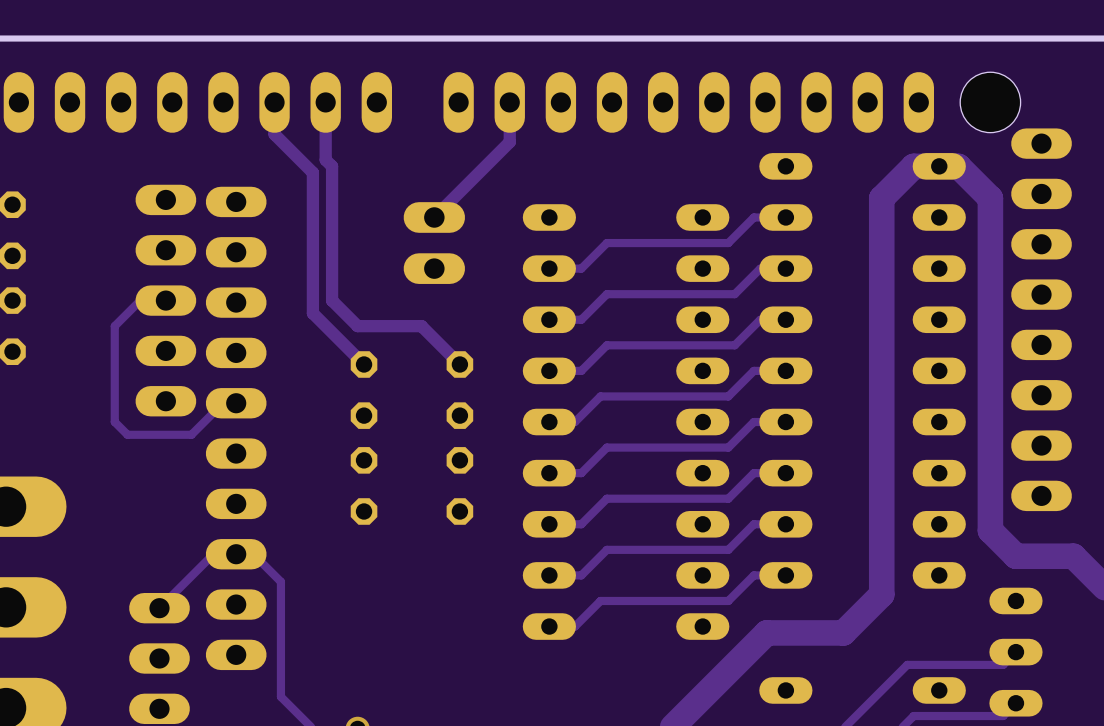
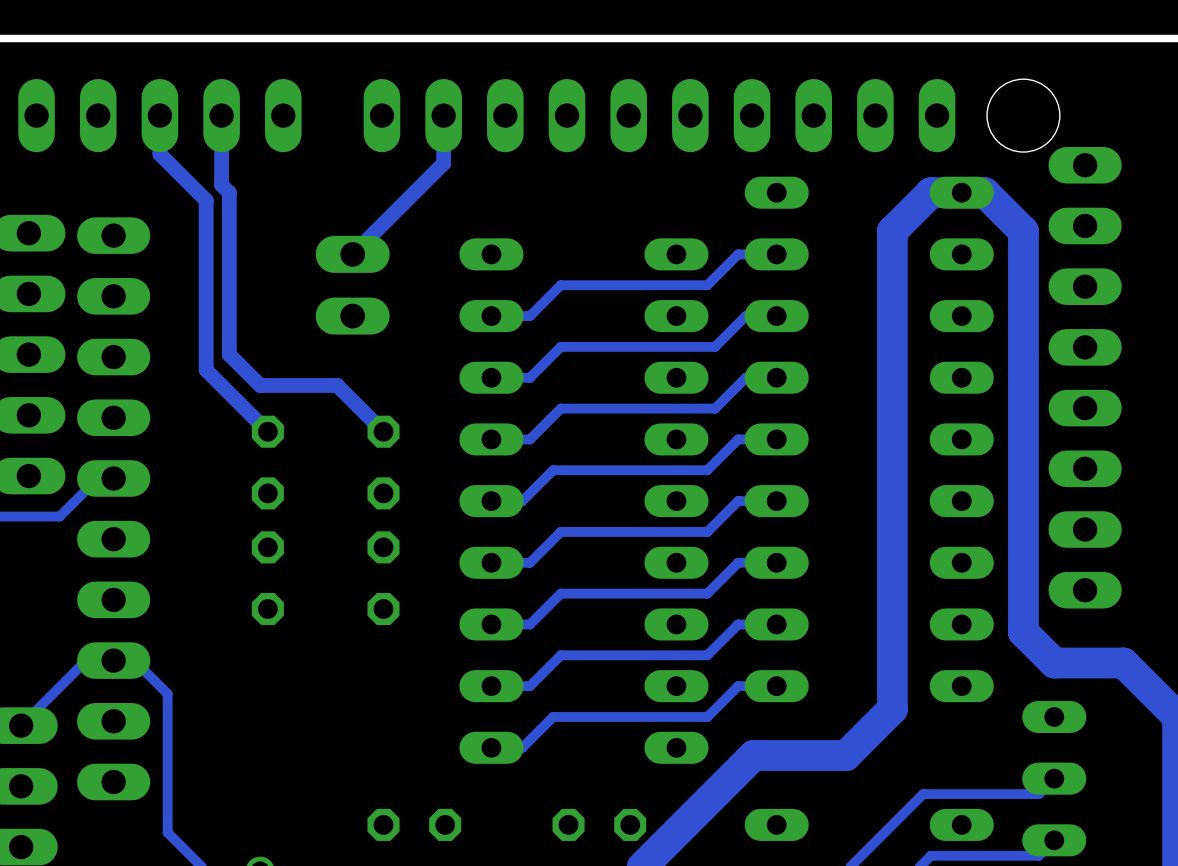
part: none -> (414, 824)
part: none -> (599, 824)

